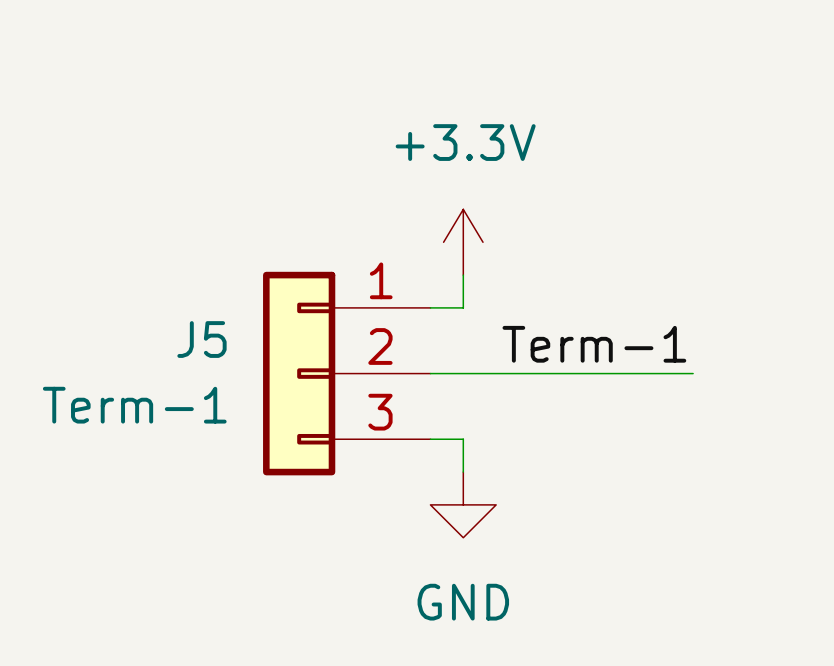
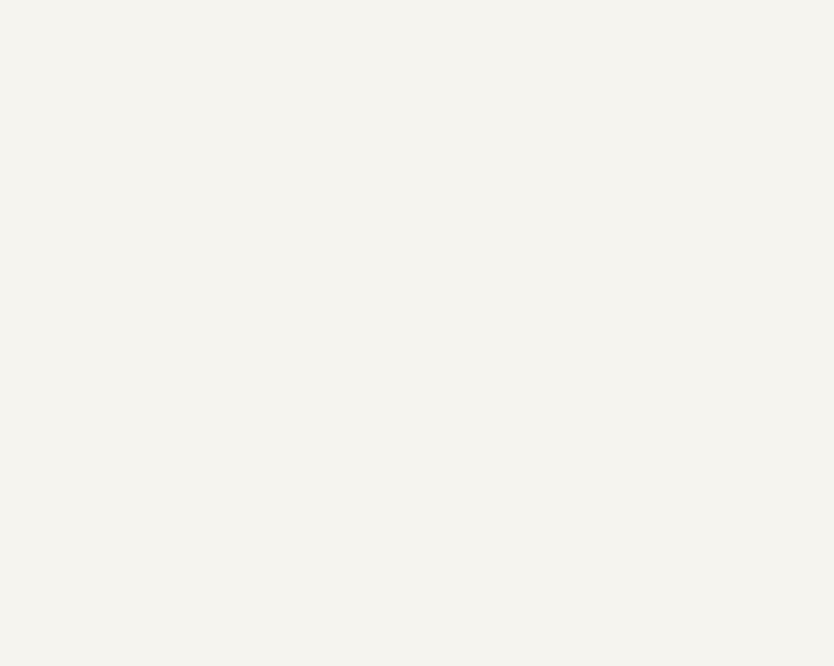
power symbol: +3.3V (463, 242) -> none
wire: (463, 275) (463, 307) (430, 307) -> none
label: Term-1 (594, 344) -> none
J5: Term-1 (346, 373) -> none
wire: (430, 373) (693, 373) -> none
wire: (430, 439) (463, 439) (463, 472) -> none
power symbol: GND (463, 504) -> none

